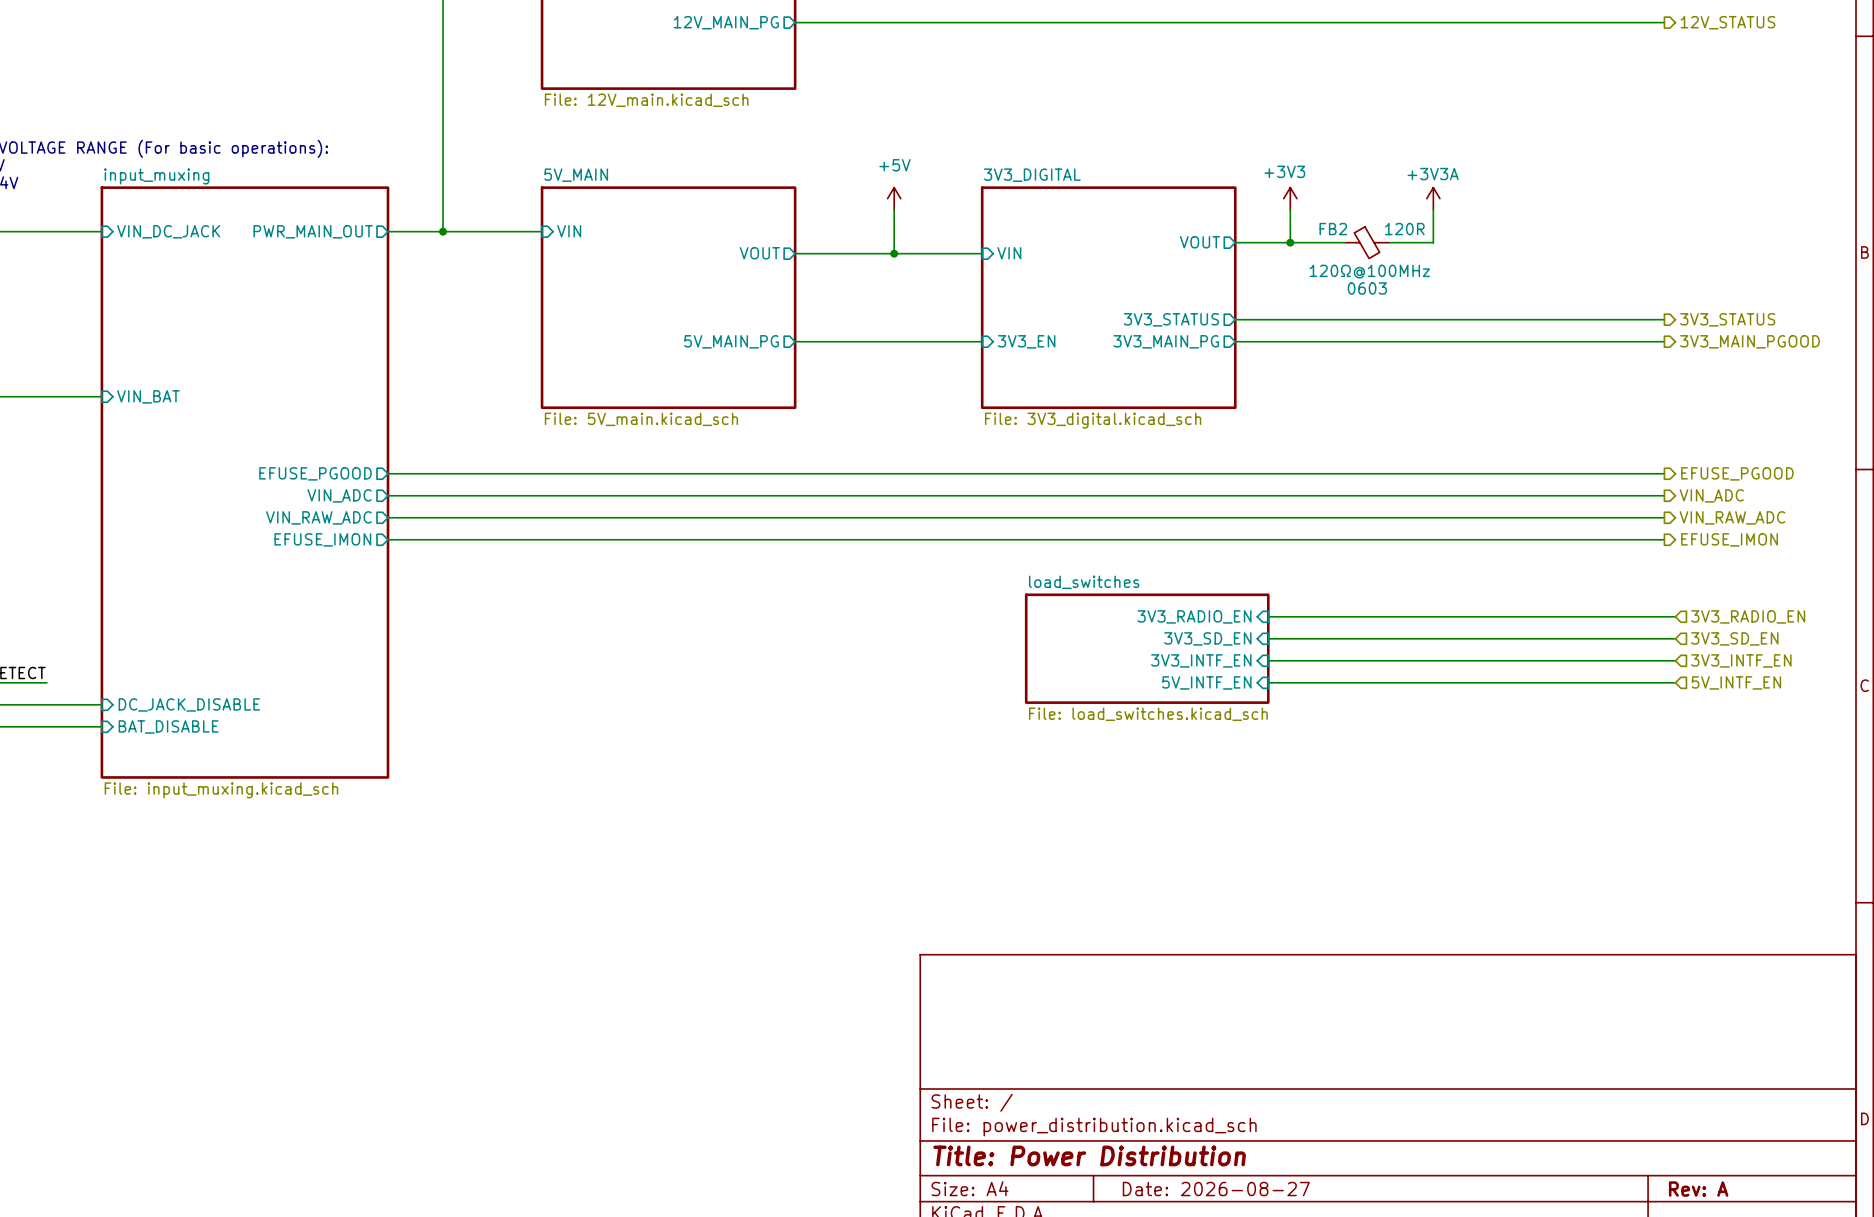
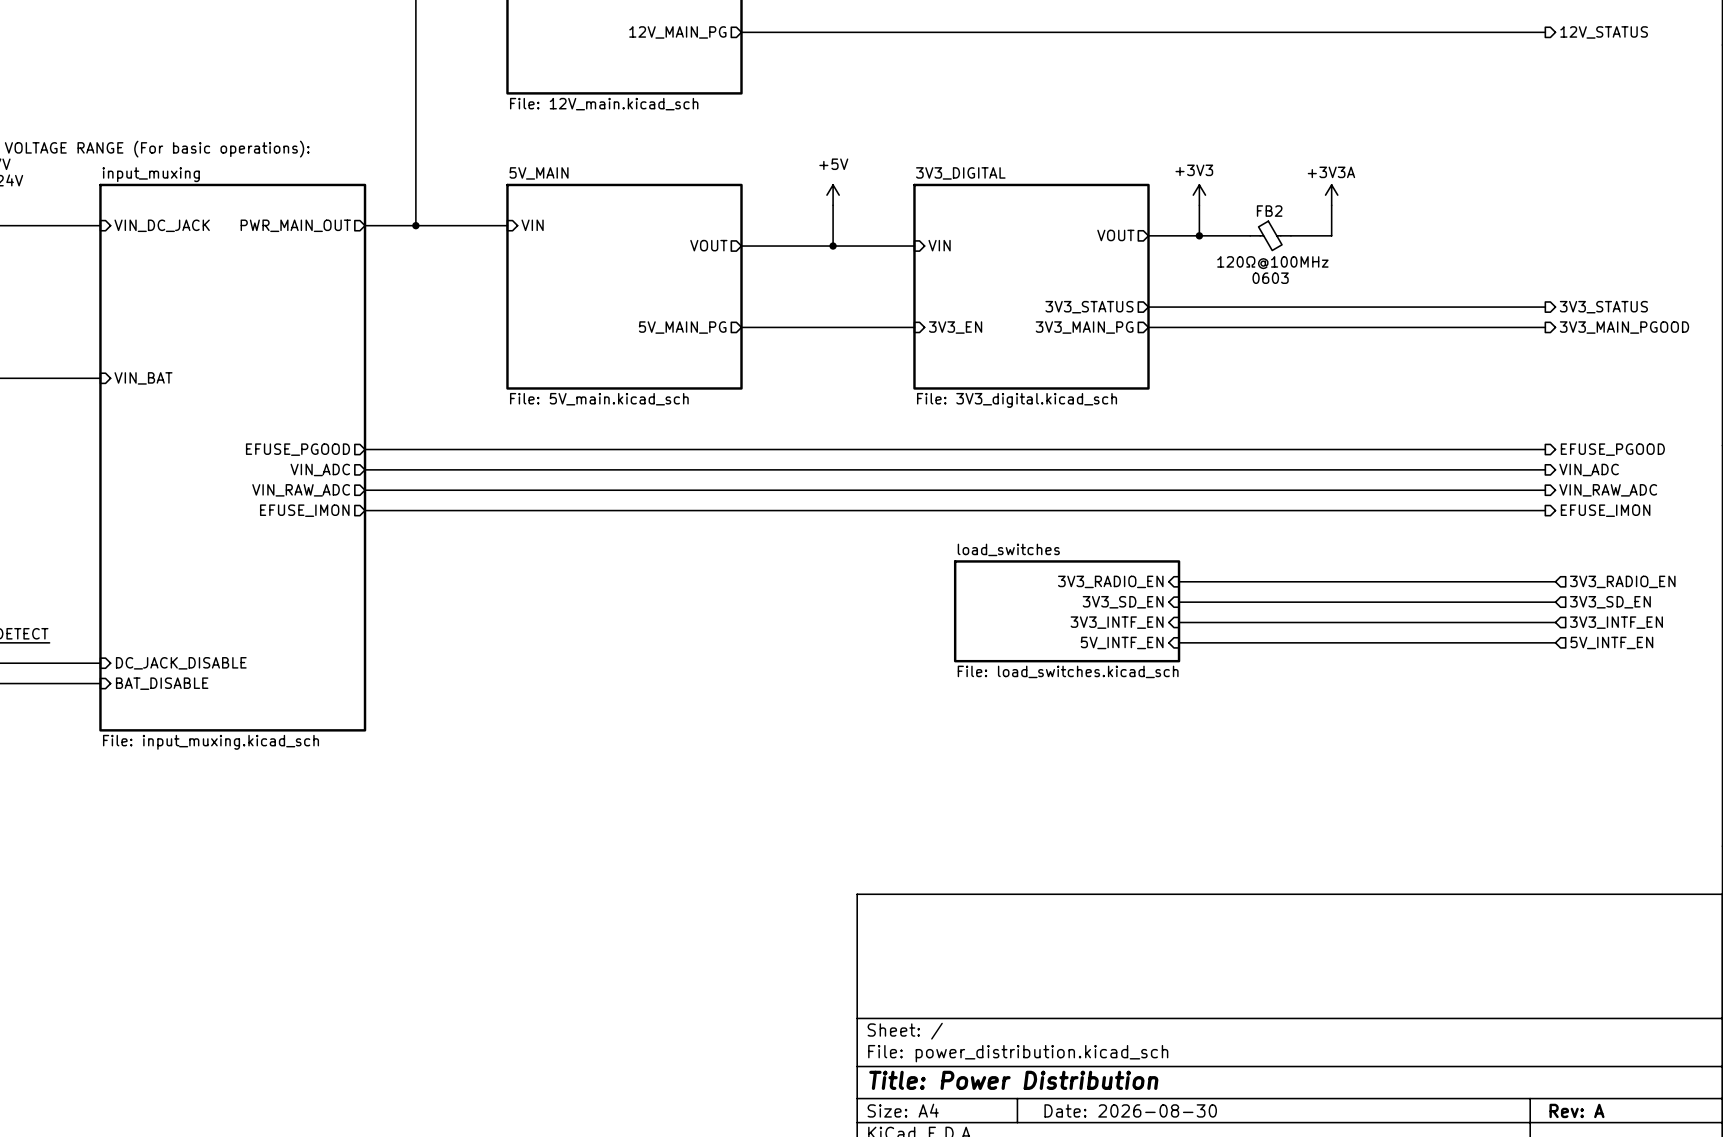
FB2 name position: FB2 (1333, 229) -> FB2 (1269, 211)
FB2 value: 120R (1404, 229) -> none
title block: Date: 2026-08-27 (1216, 1189) -> Date: 2026-08-30 (1130, 1110)

